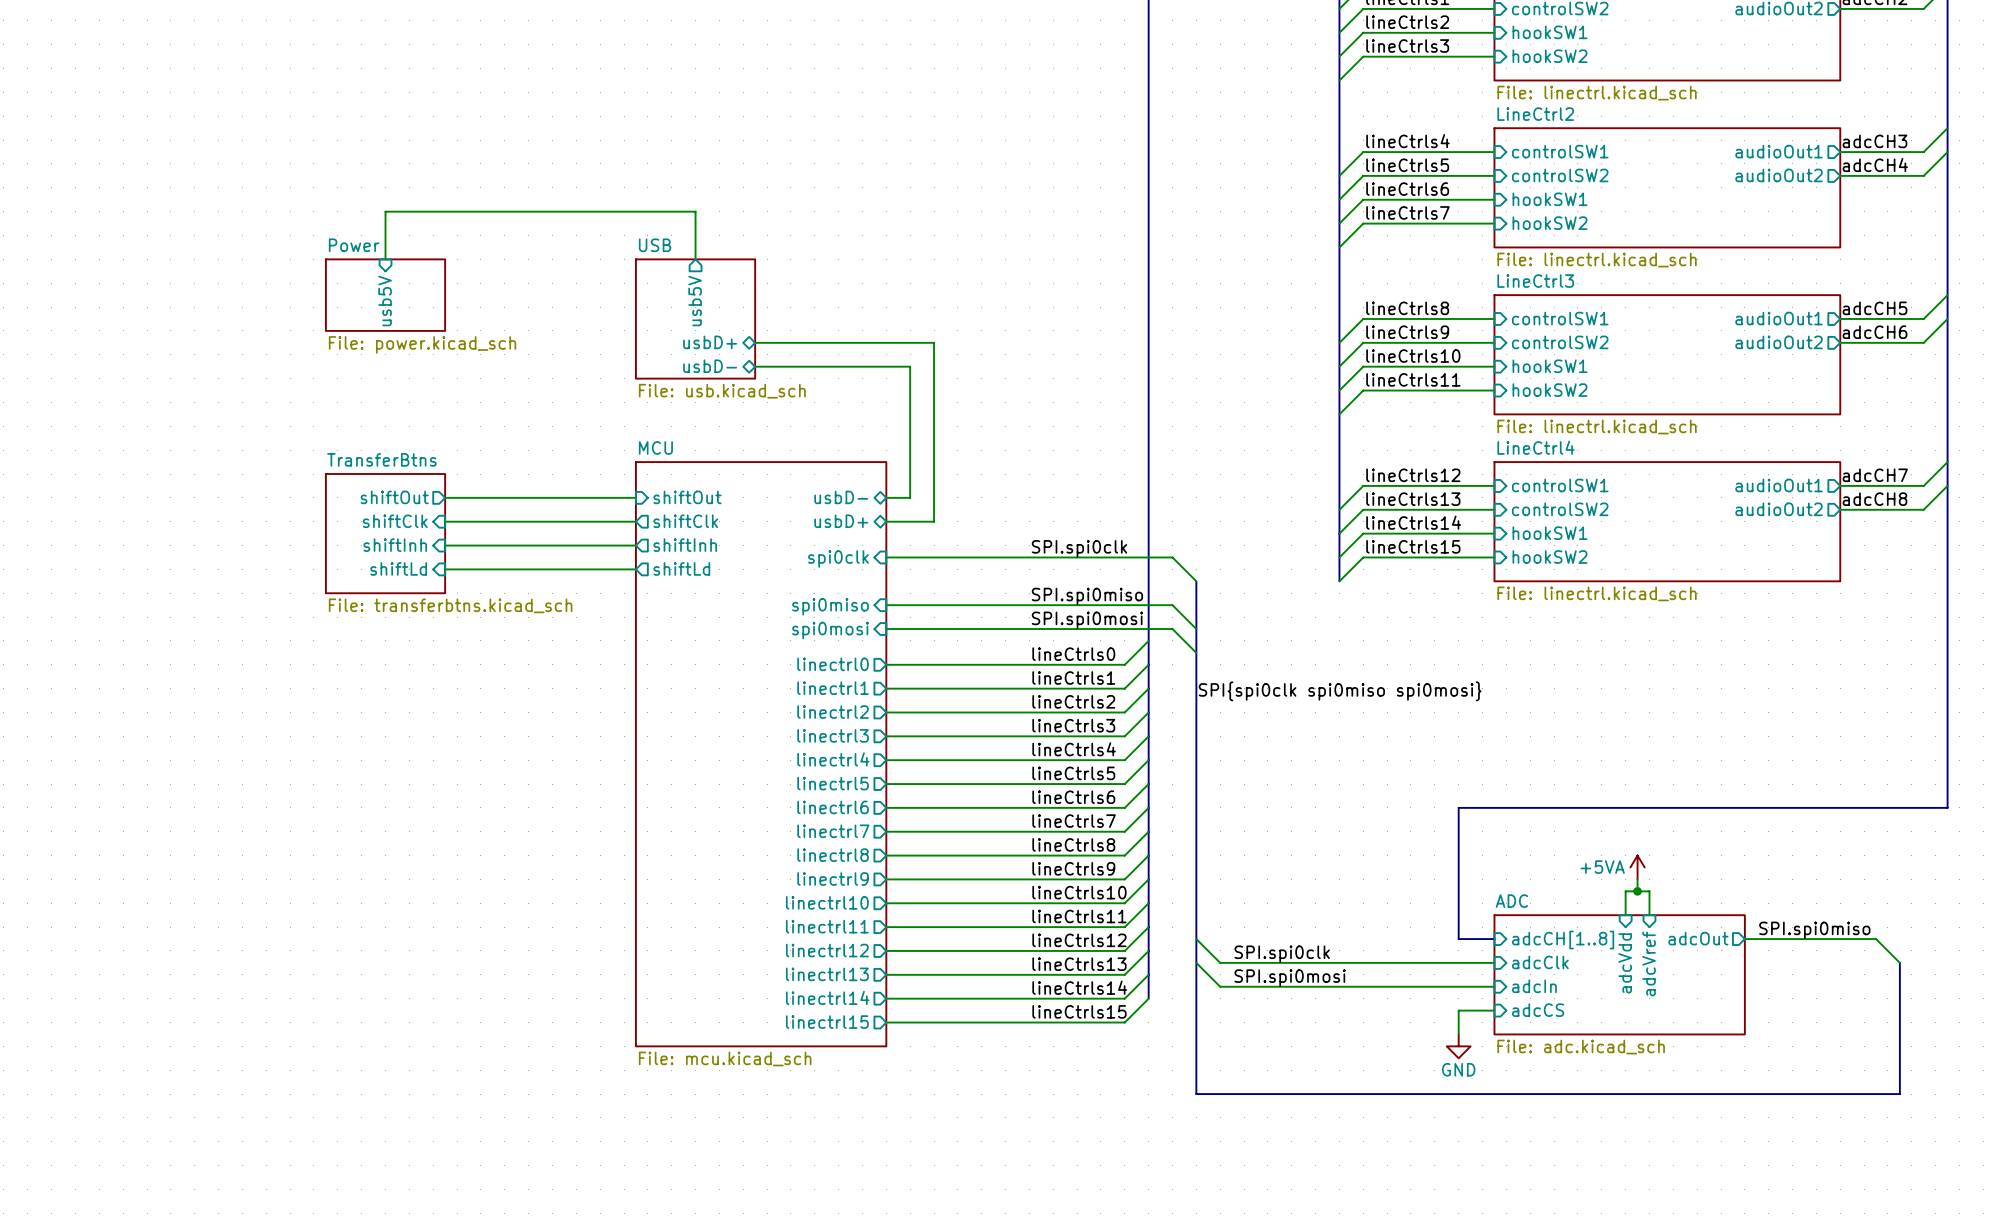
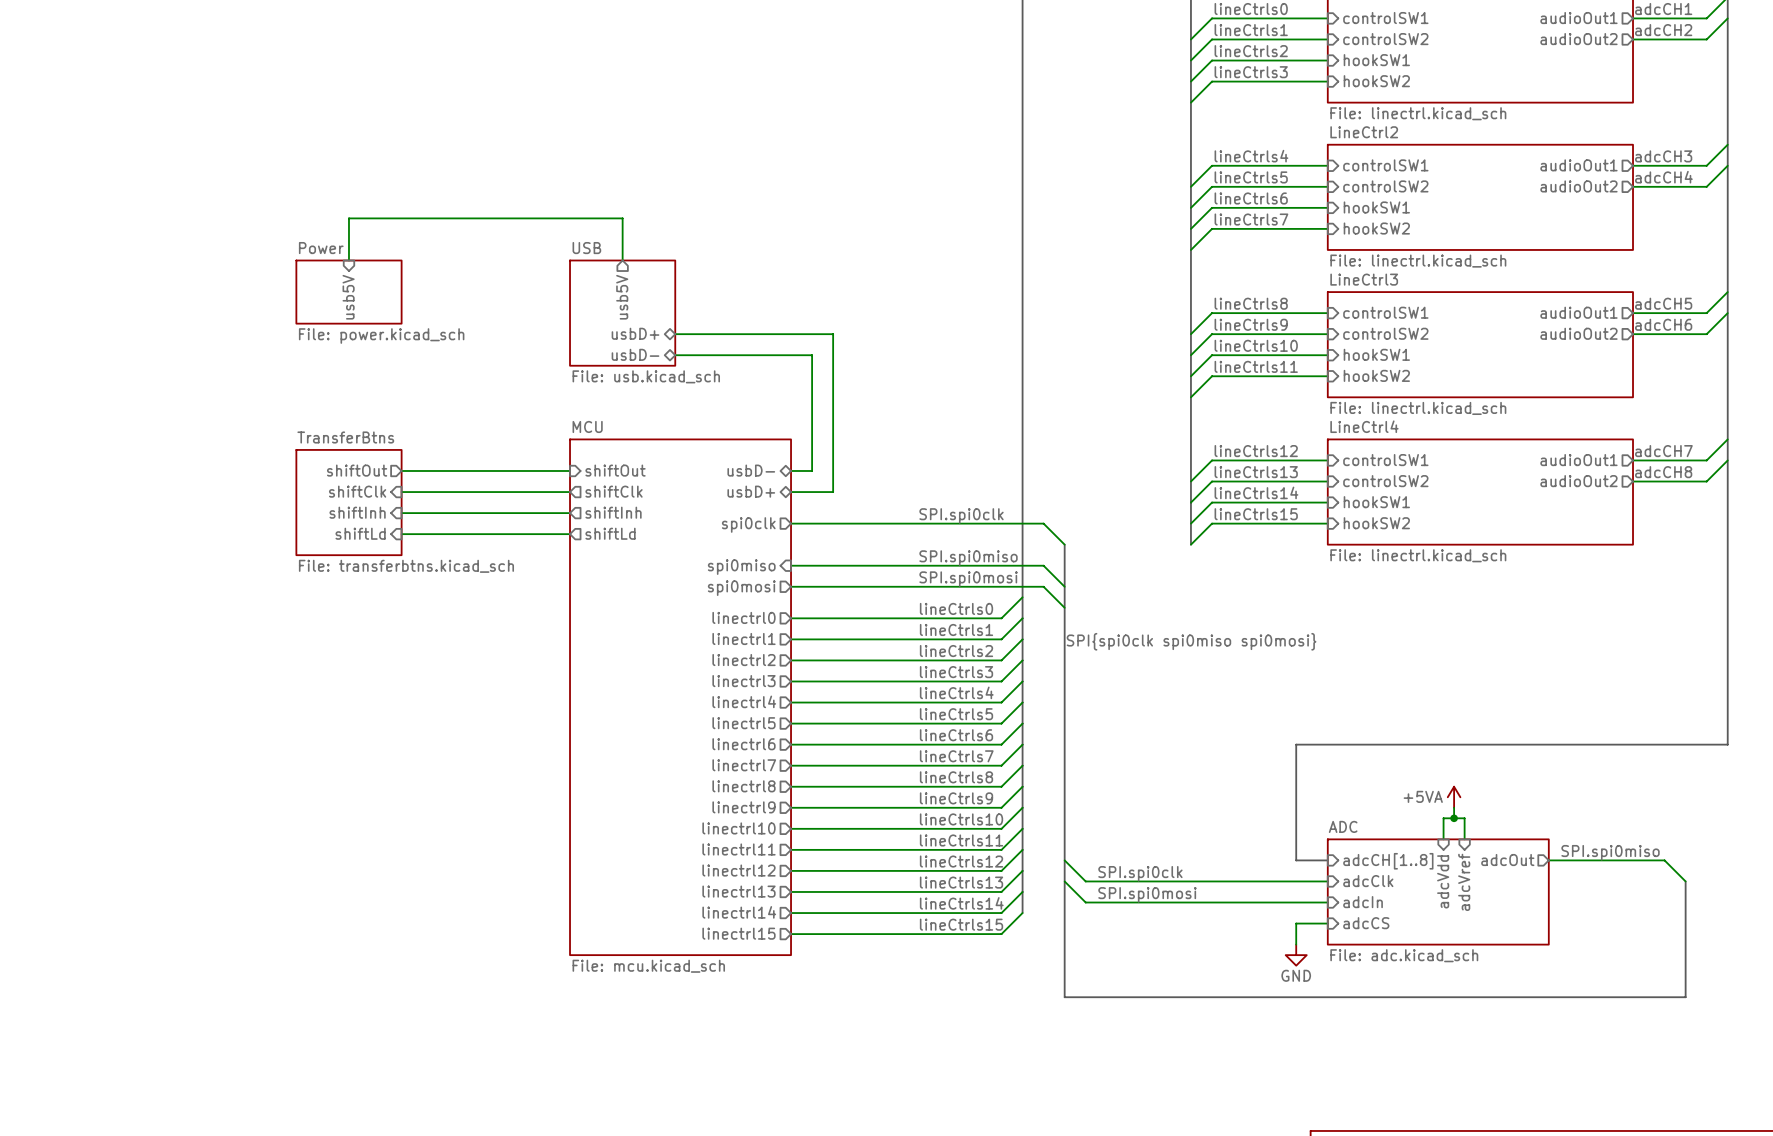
sheet pin shape: input (838, 559) -> output (748, 524)
sheet pin shape: input (830, 630) -> output (741, 588)

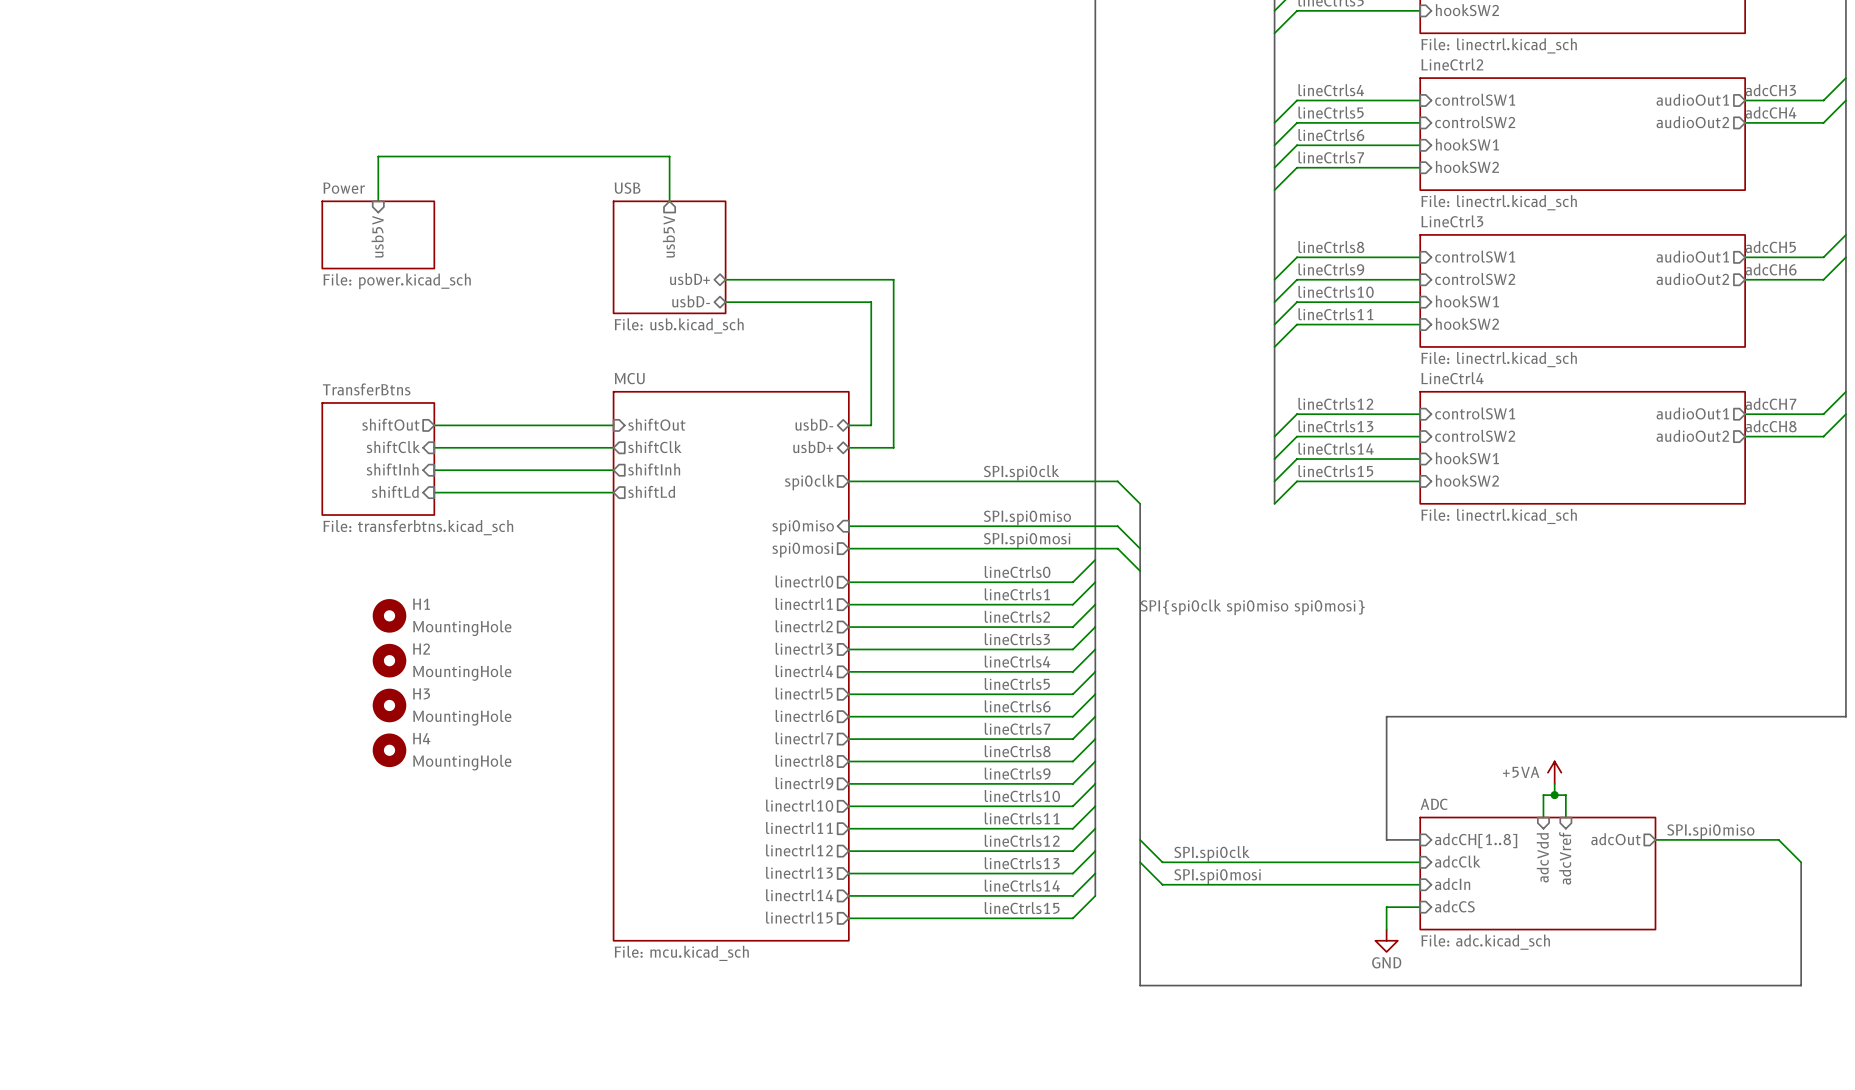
H1: none -> MountingHole (389, 615)
H2: none -> MountingHole (389, 660)
H3: none -> MountingHole (389, 705)
H4: none -> MountingHole (389, 750)

